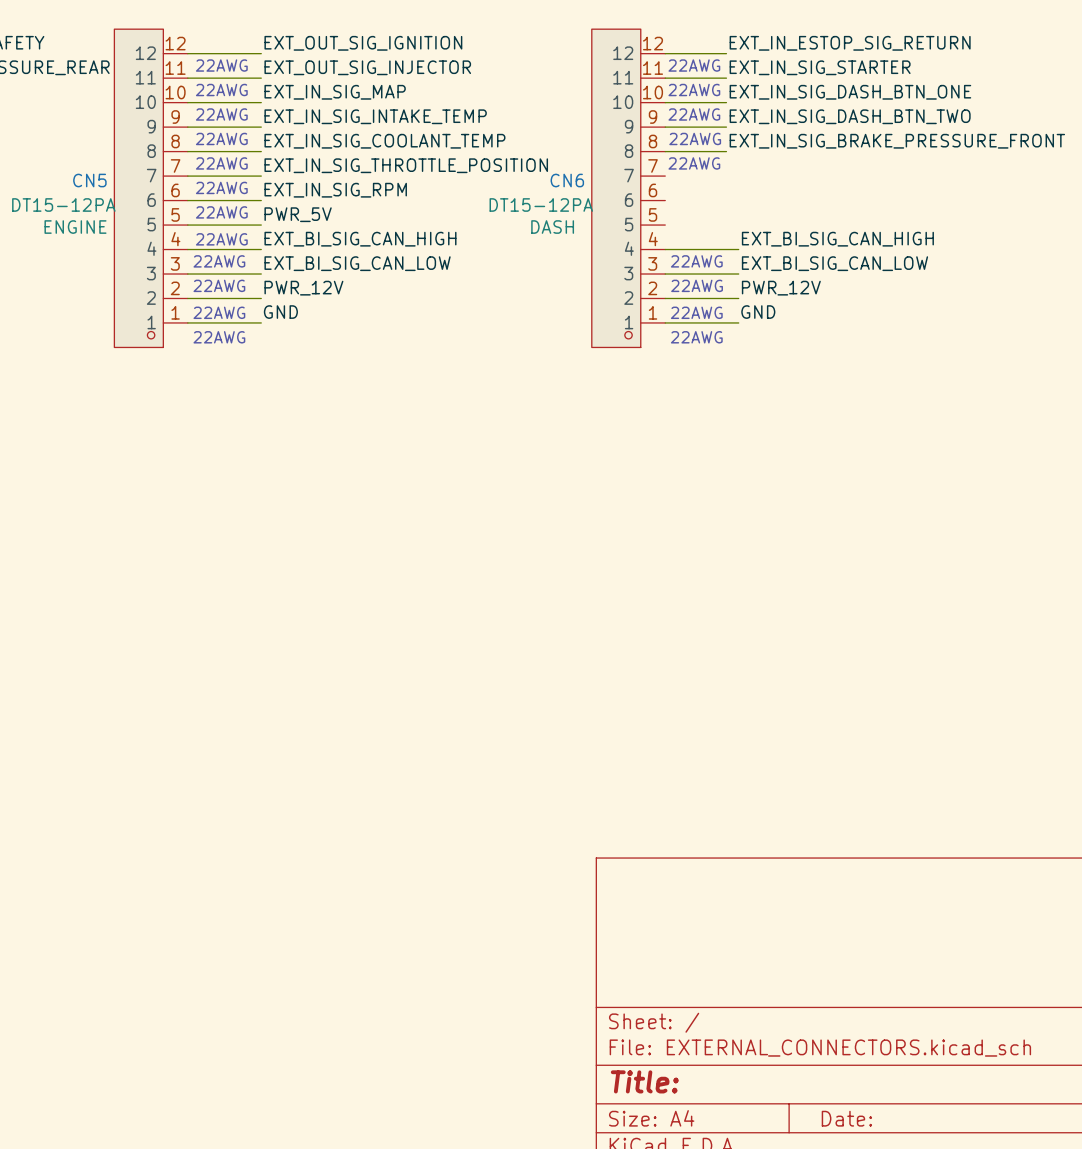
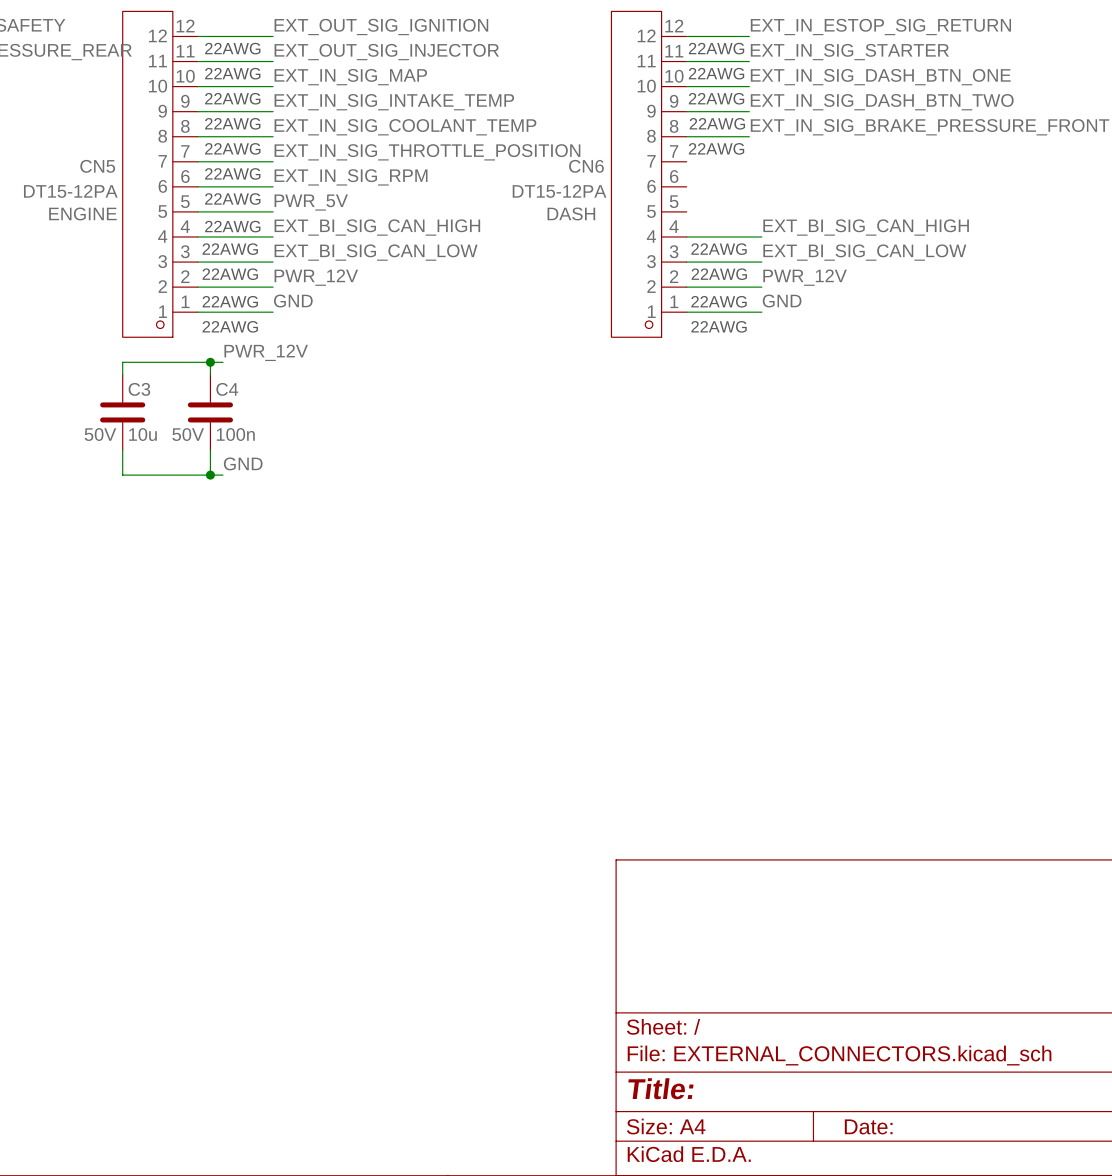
label: none -> PWR_12V (266, 352)
wire: none -> (210, 362) (210, 374)
junction: none -> (210, 362)
wire: none -> (222, 362) (122, 362) (122, 374)
C3: none -> 10u (122, 412)
C4: none -> 100n (210, 412)
wire: none -> (122, 450) (122, 475) (222, 475)
wire: none -> (210, 450) (210, 475)
label: none -> GND (243, 463)
junction: none -> (210, 475)

